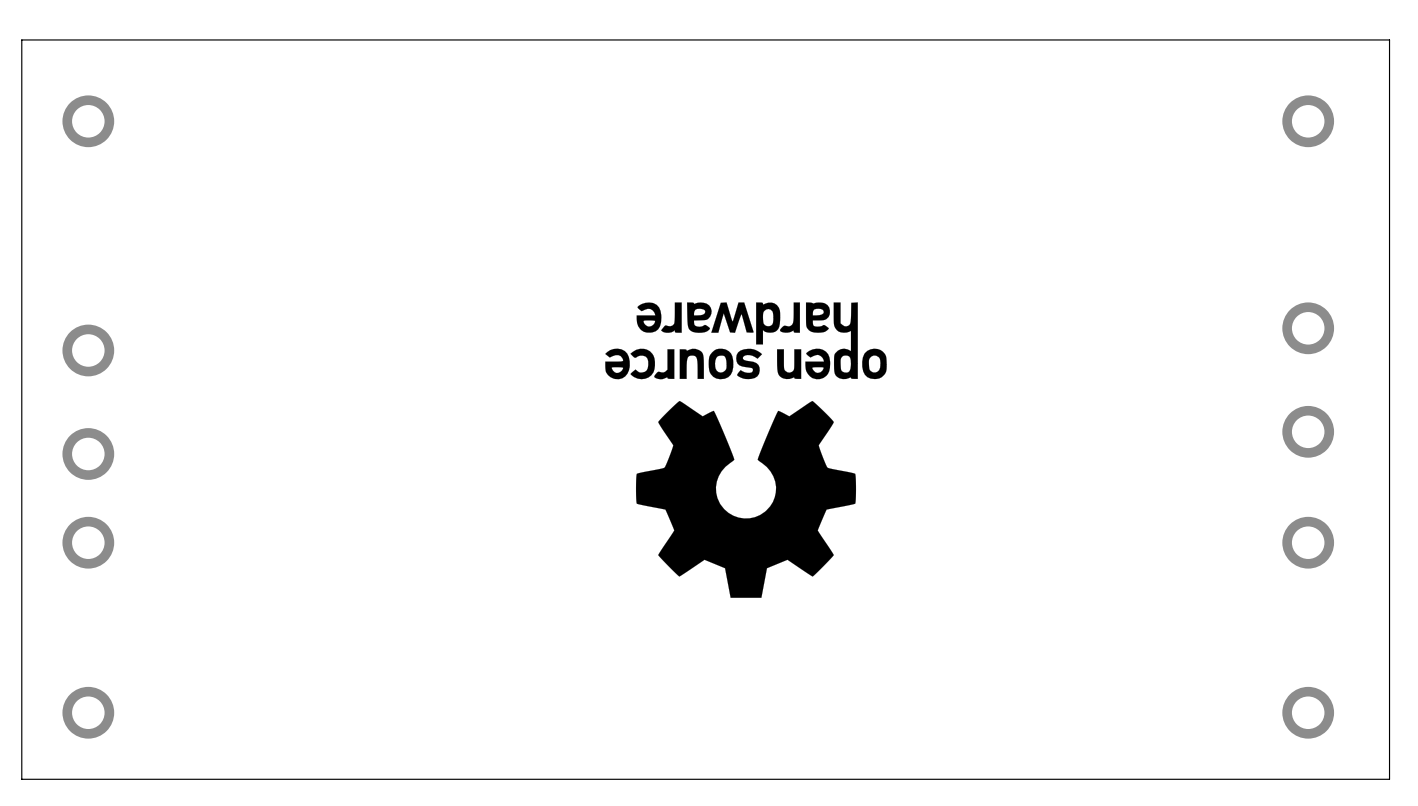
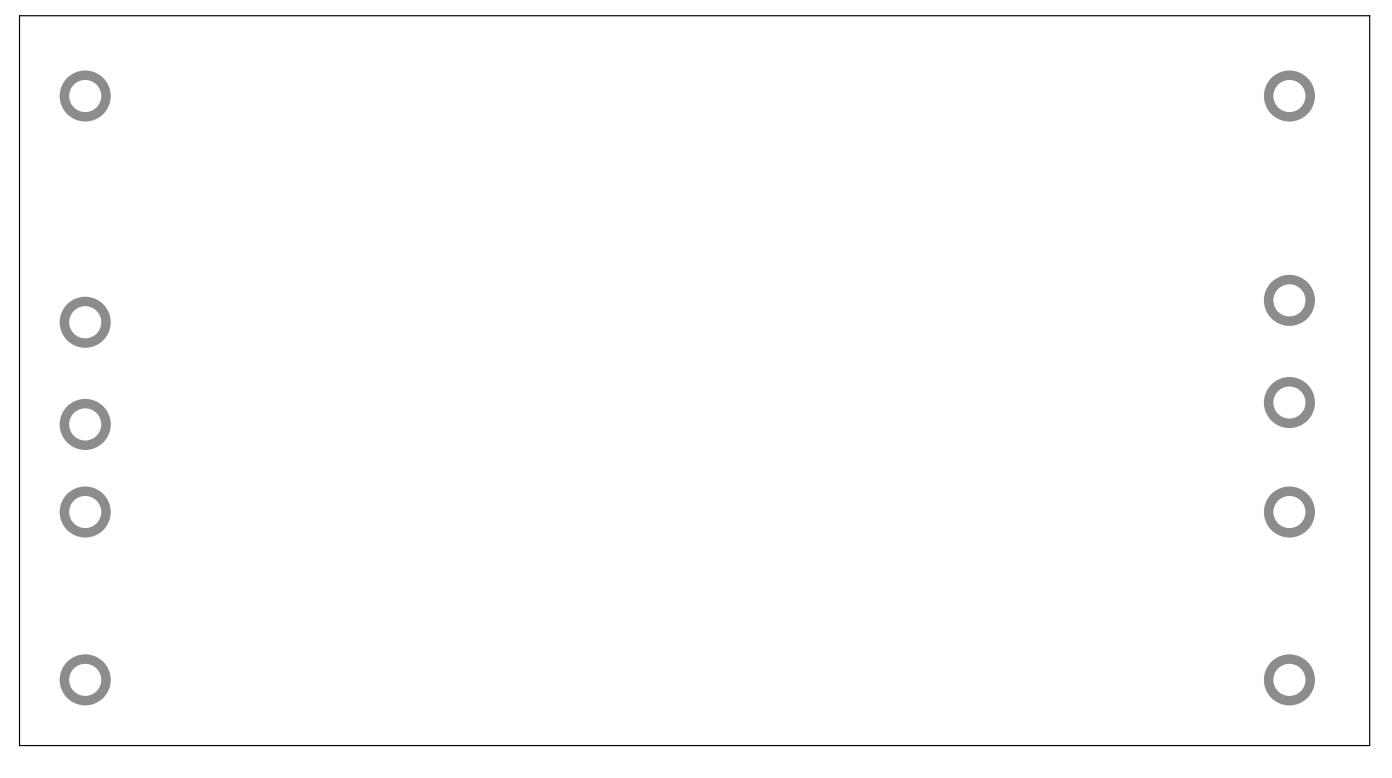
drawing: [605, 302, 887, 598] -> none

